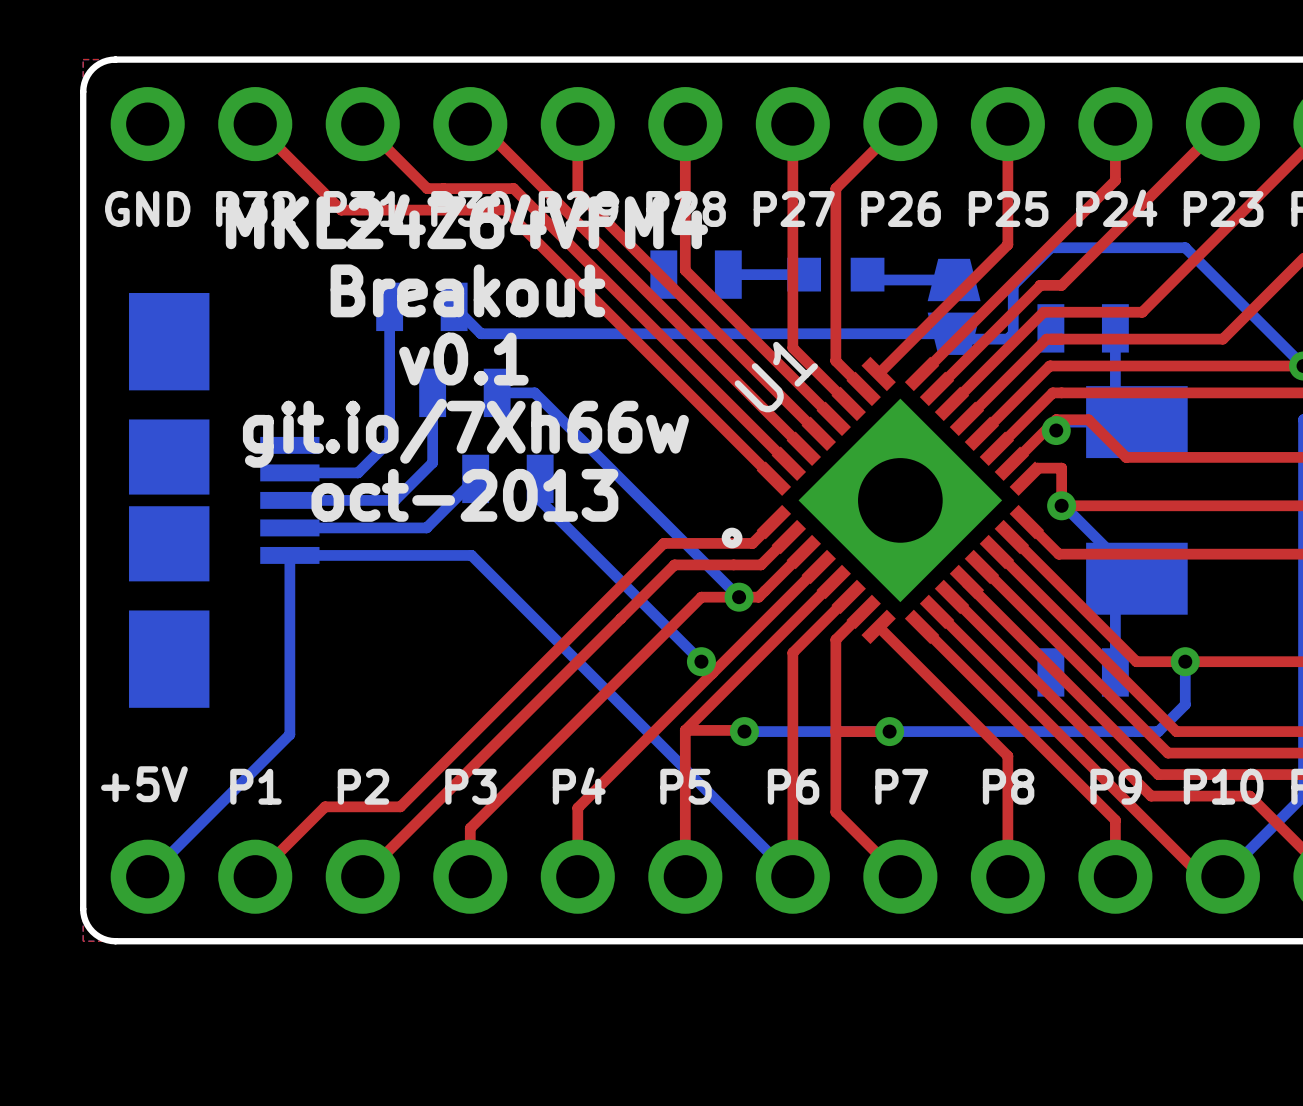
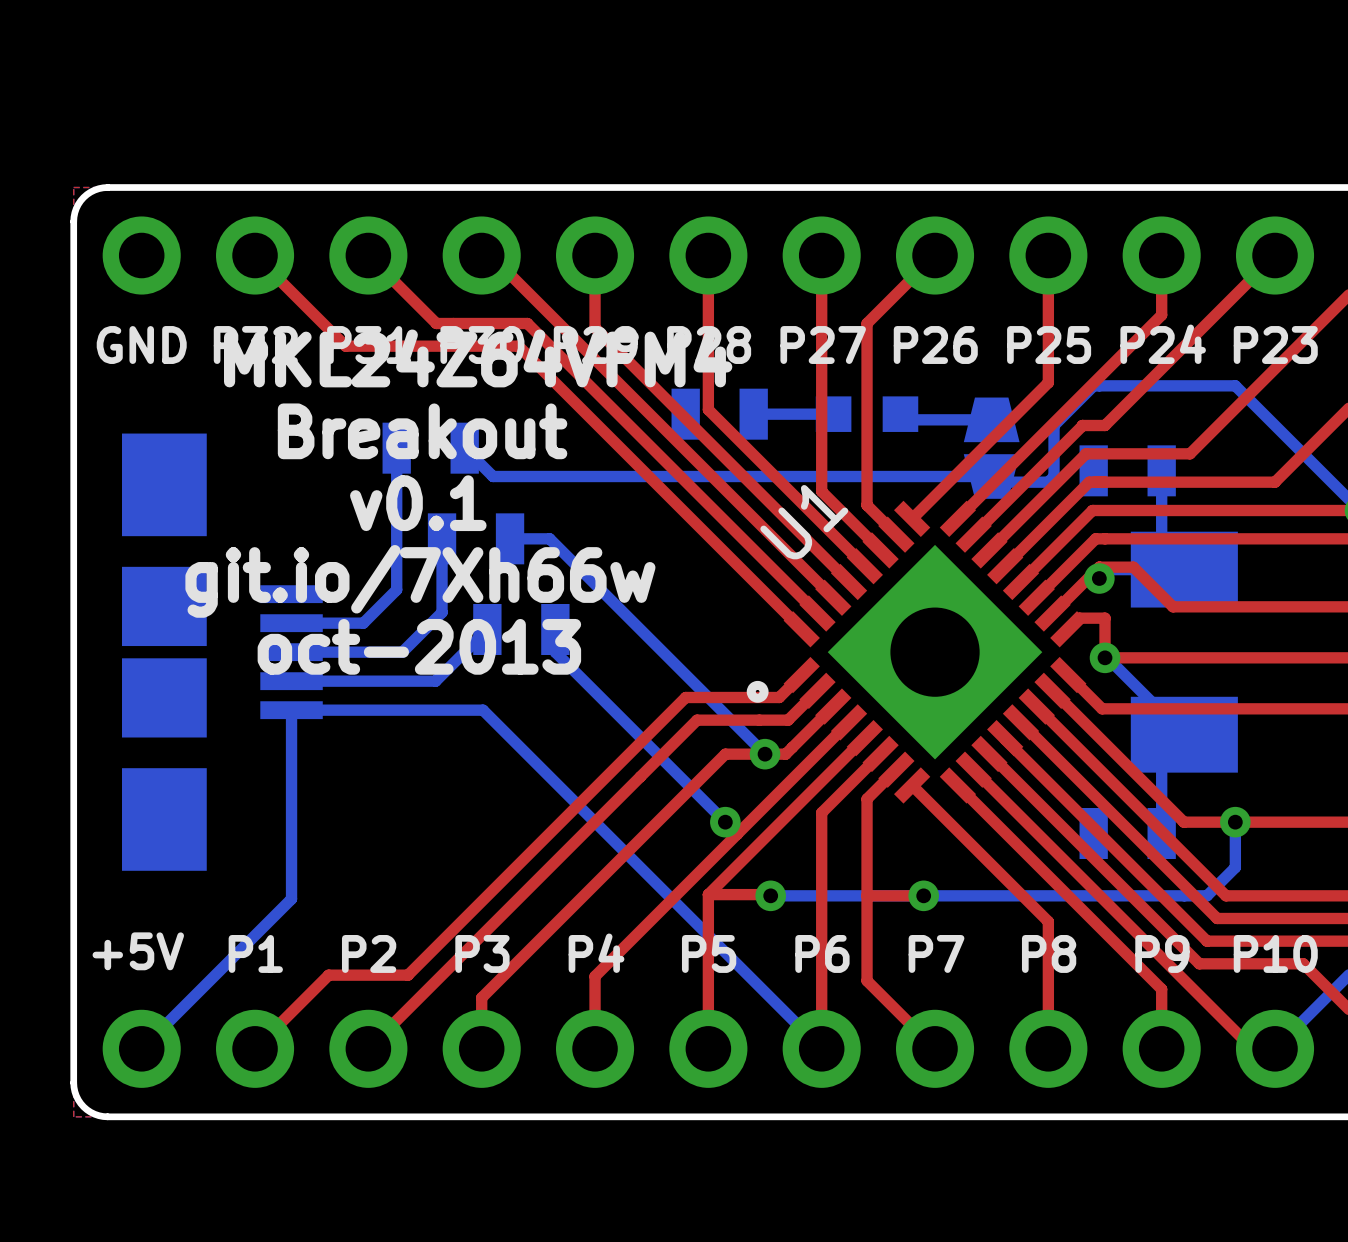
text position: Breakout (467, 290) -> Breakout (422, 431)
text position: v0.1 (463, 359) -> v0.1 (418, 503)
text position: git.io/7Xh66w (465, 433) -> git.io/7Xh66w (420, 581)
text position: oct-2013 (464, 495) -> oct-2013 (419, 646)

